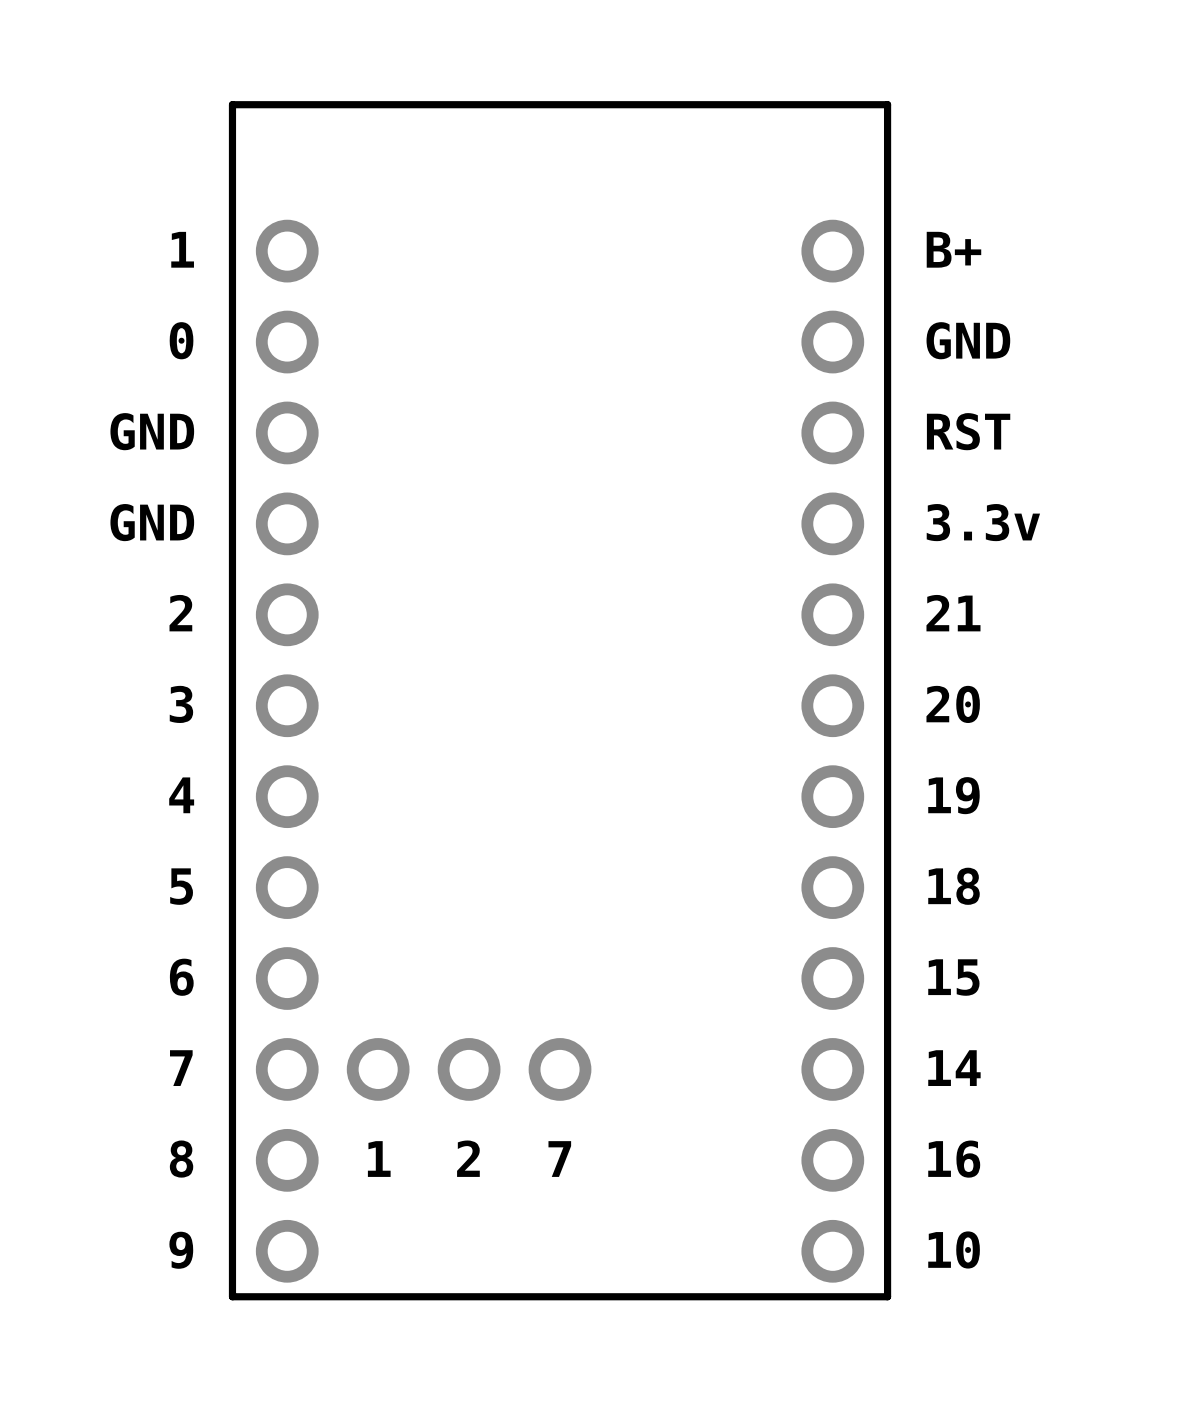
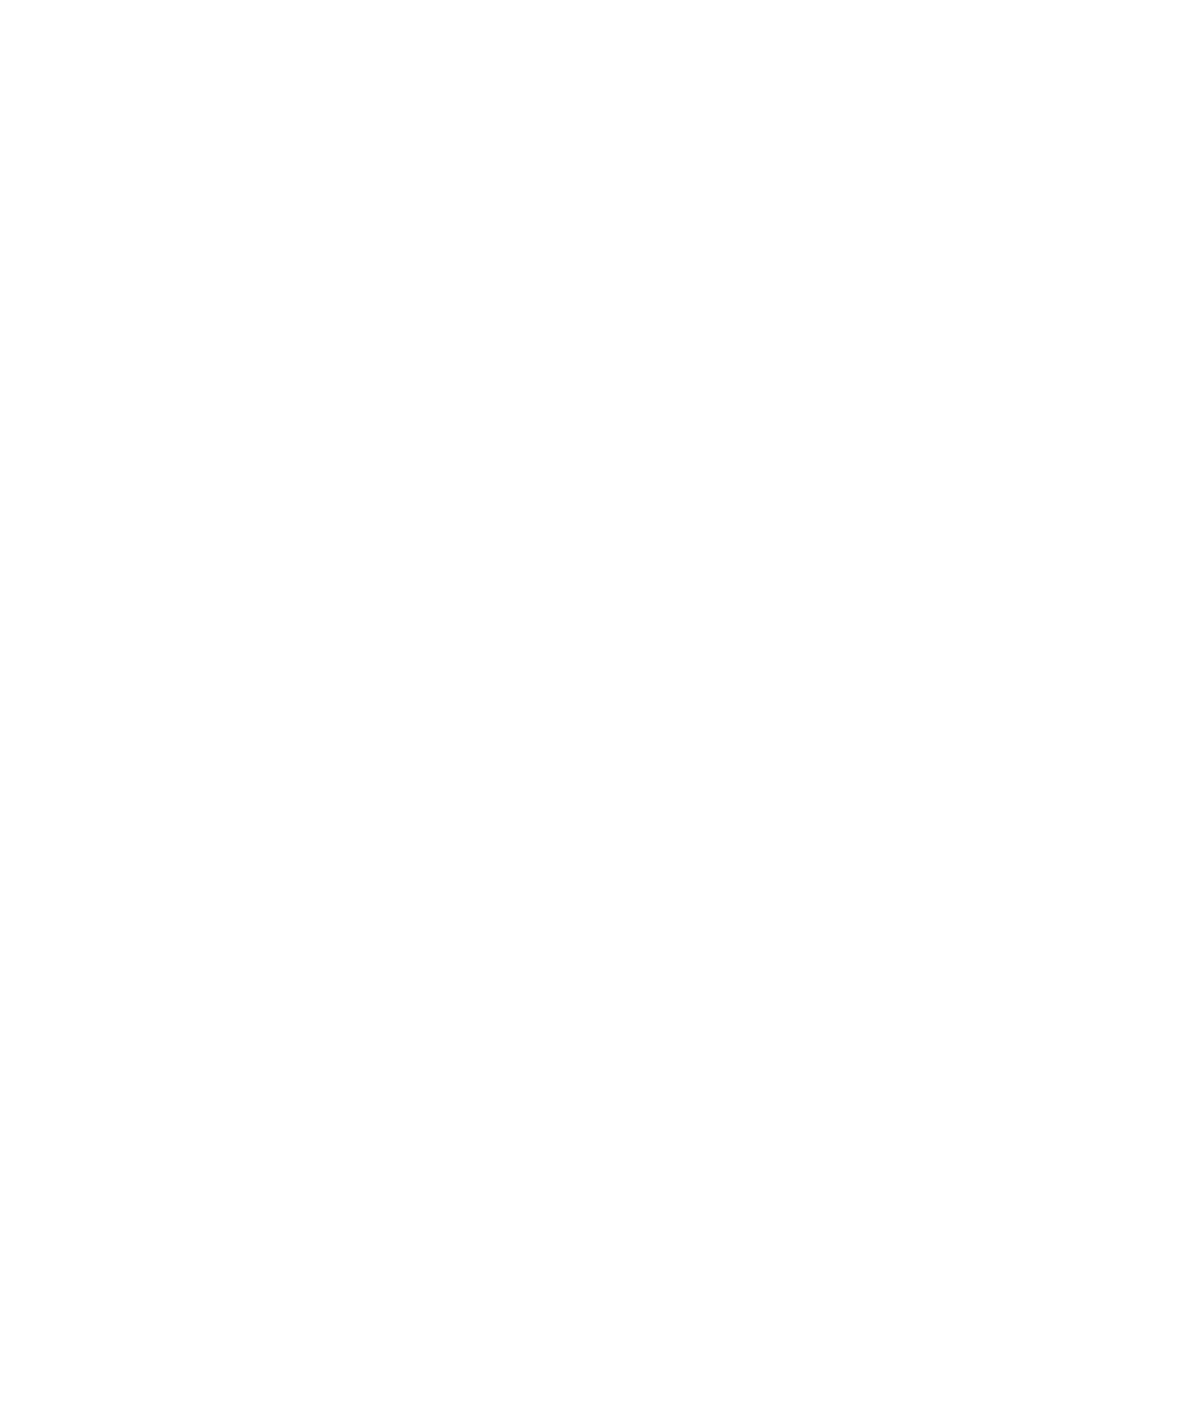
part: (560, 700) -> none

